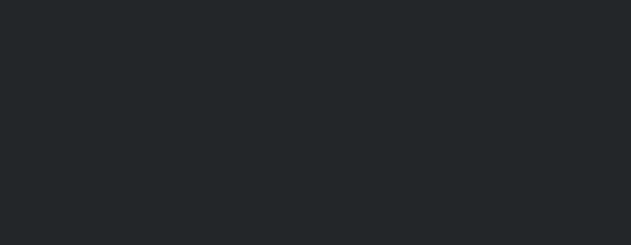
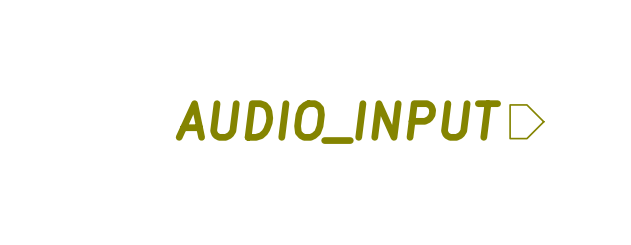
hierarchical label: none -> AUDIO_INPUT (338, 122)

